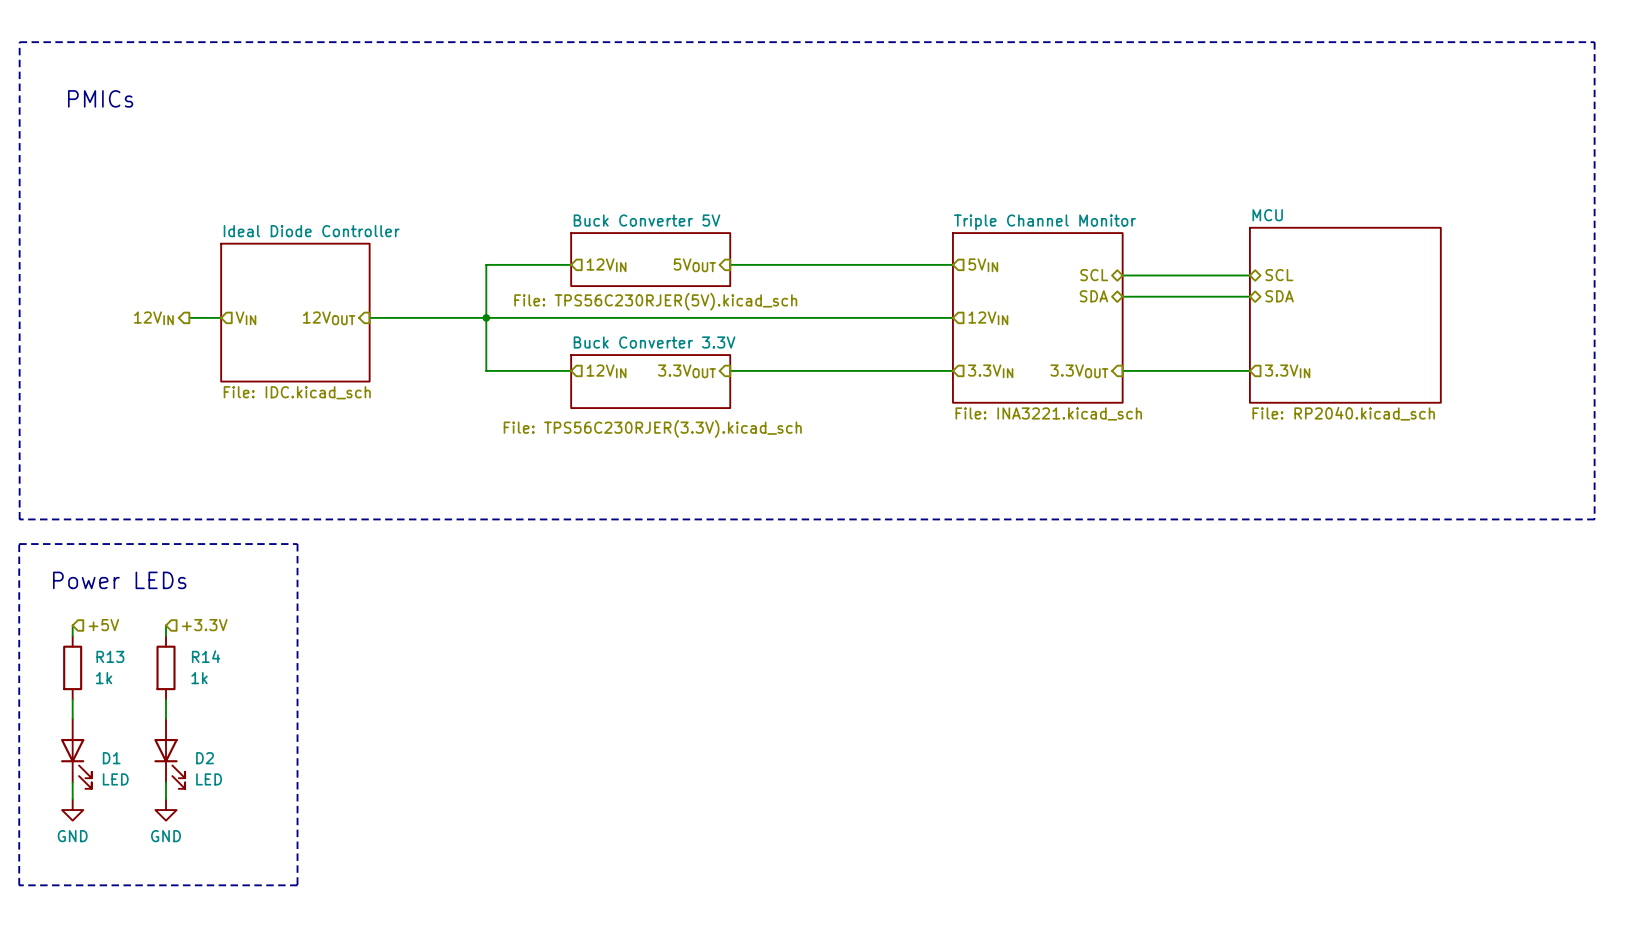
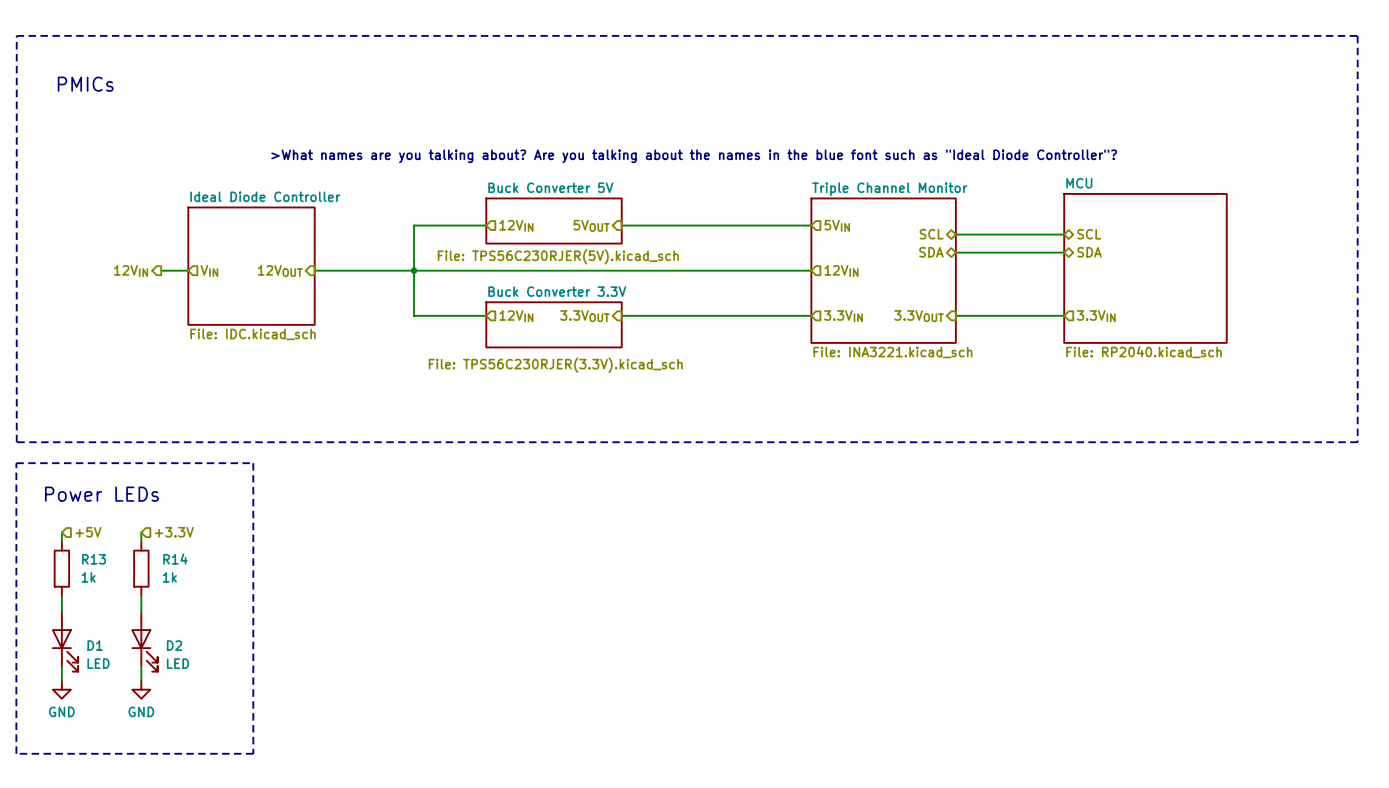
text: none -> >What names are you talking about? Are you talking about the names in the blue font such as "Ideal Diode Controller"? (694, 156)

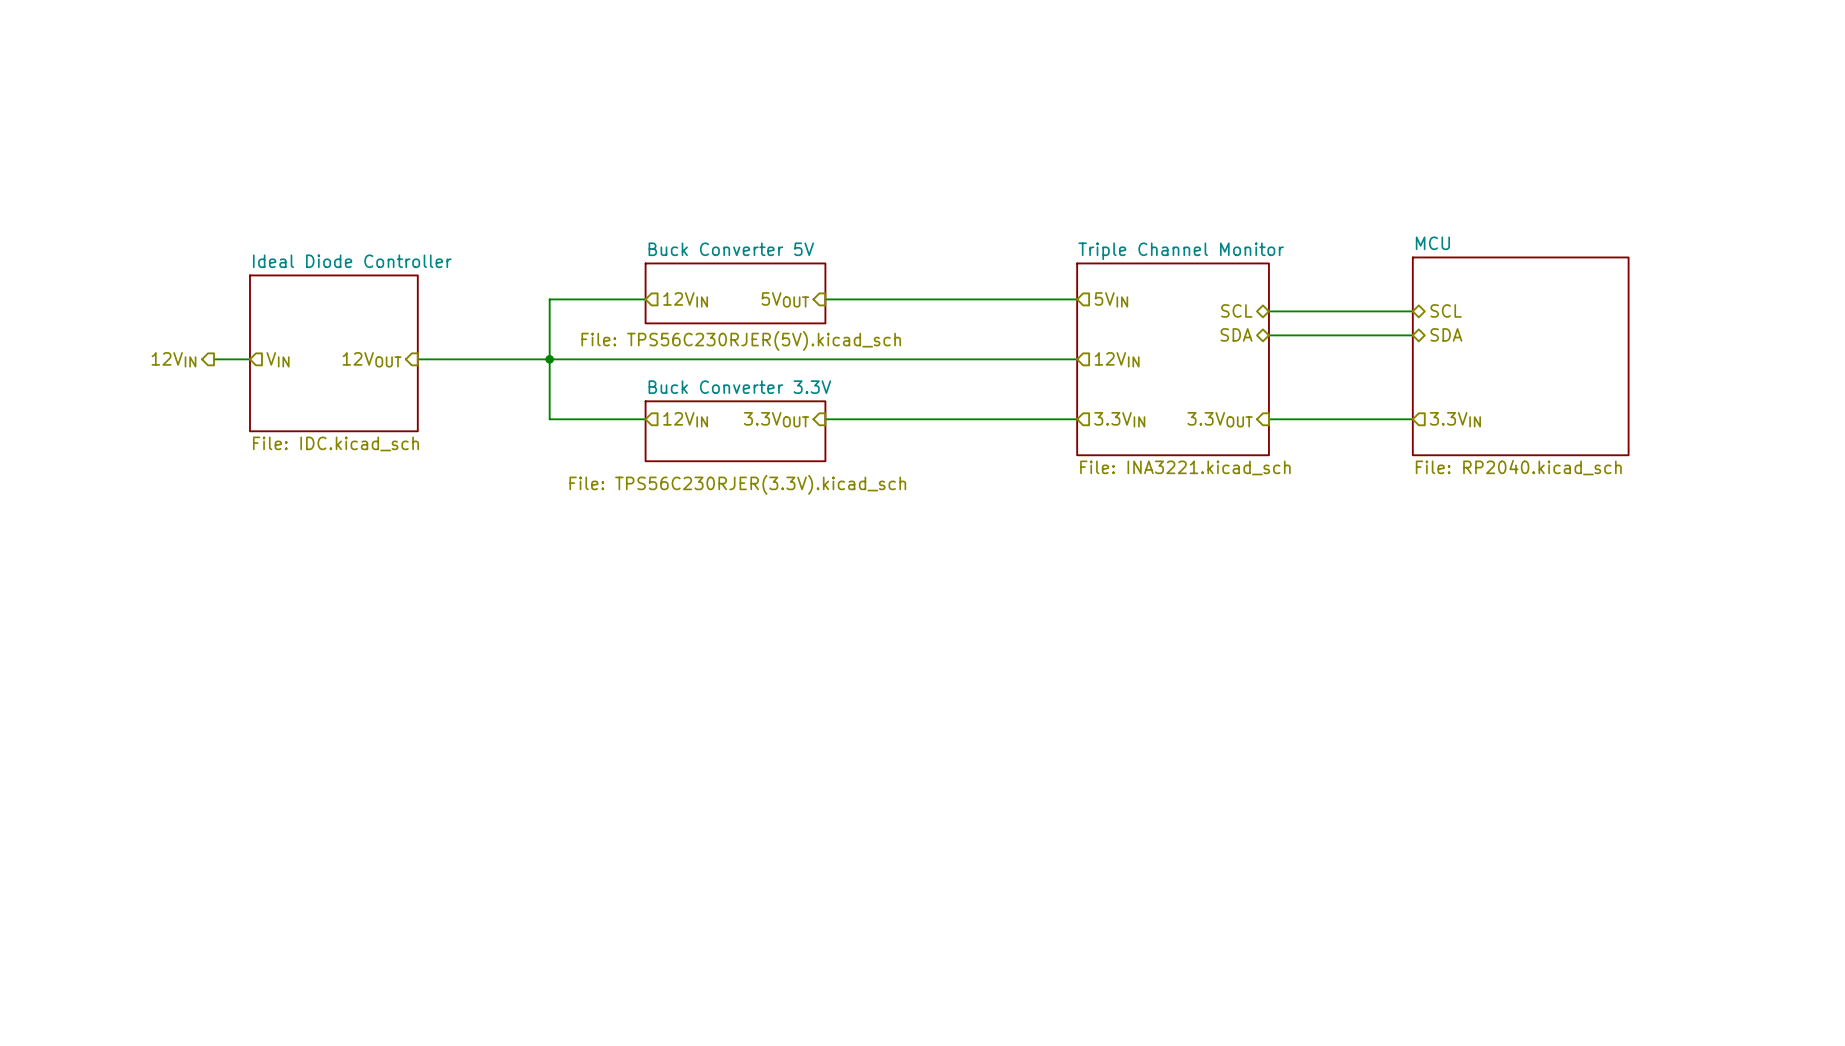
line: (16, 35) (1357, 35) (1357, 442) (16, 442) (16, 35) -> none
text: PMICs (85, 84) -> none
text: >What names are you talking about? Are you talking about the names in the blue font such as "Ideal Diode Controller"? (694, 156) -> none
line: (16, 463) (253, 463) (253, 753) (16, 753) (16, 463) -> none
text: Power LEDs (101, 494) -> none
wire: (61, 532) (61, 541) -> none
hierarchical label: +5V (88, 532) -> none
wire: (141, 532) (141, 541) -> none
hierarchical label: +3.3V (174, 532) -> none
R13: 1k (61, 568) -> none
R14: 1k (141, 568) -> none
wire: (61, 595) (61, 612) -> none
wire: (141, 595) (141, 612) -> none
D1: LED (65, 641) -> none
D2: LED (144, 641) -> none
wire: (61, 666) (61, 680) -> none
wire: (141, 666) (141, 680) -> none
power symbol: GND (61, 689) -> none
power symbol: GND (141, 689) -> none

